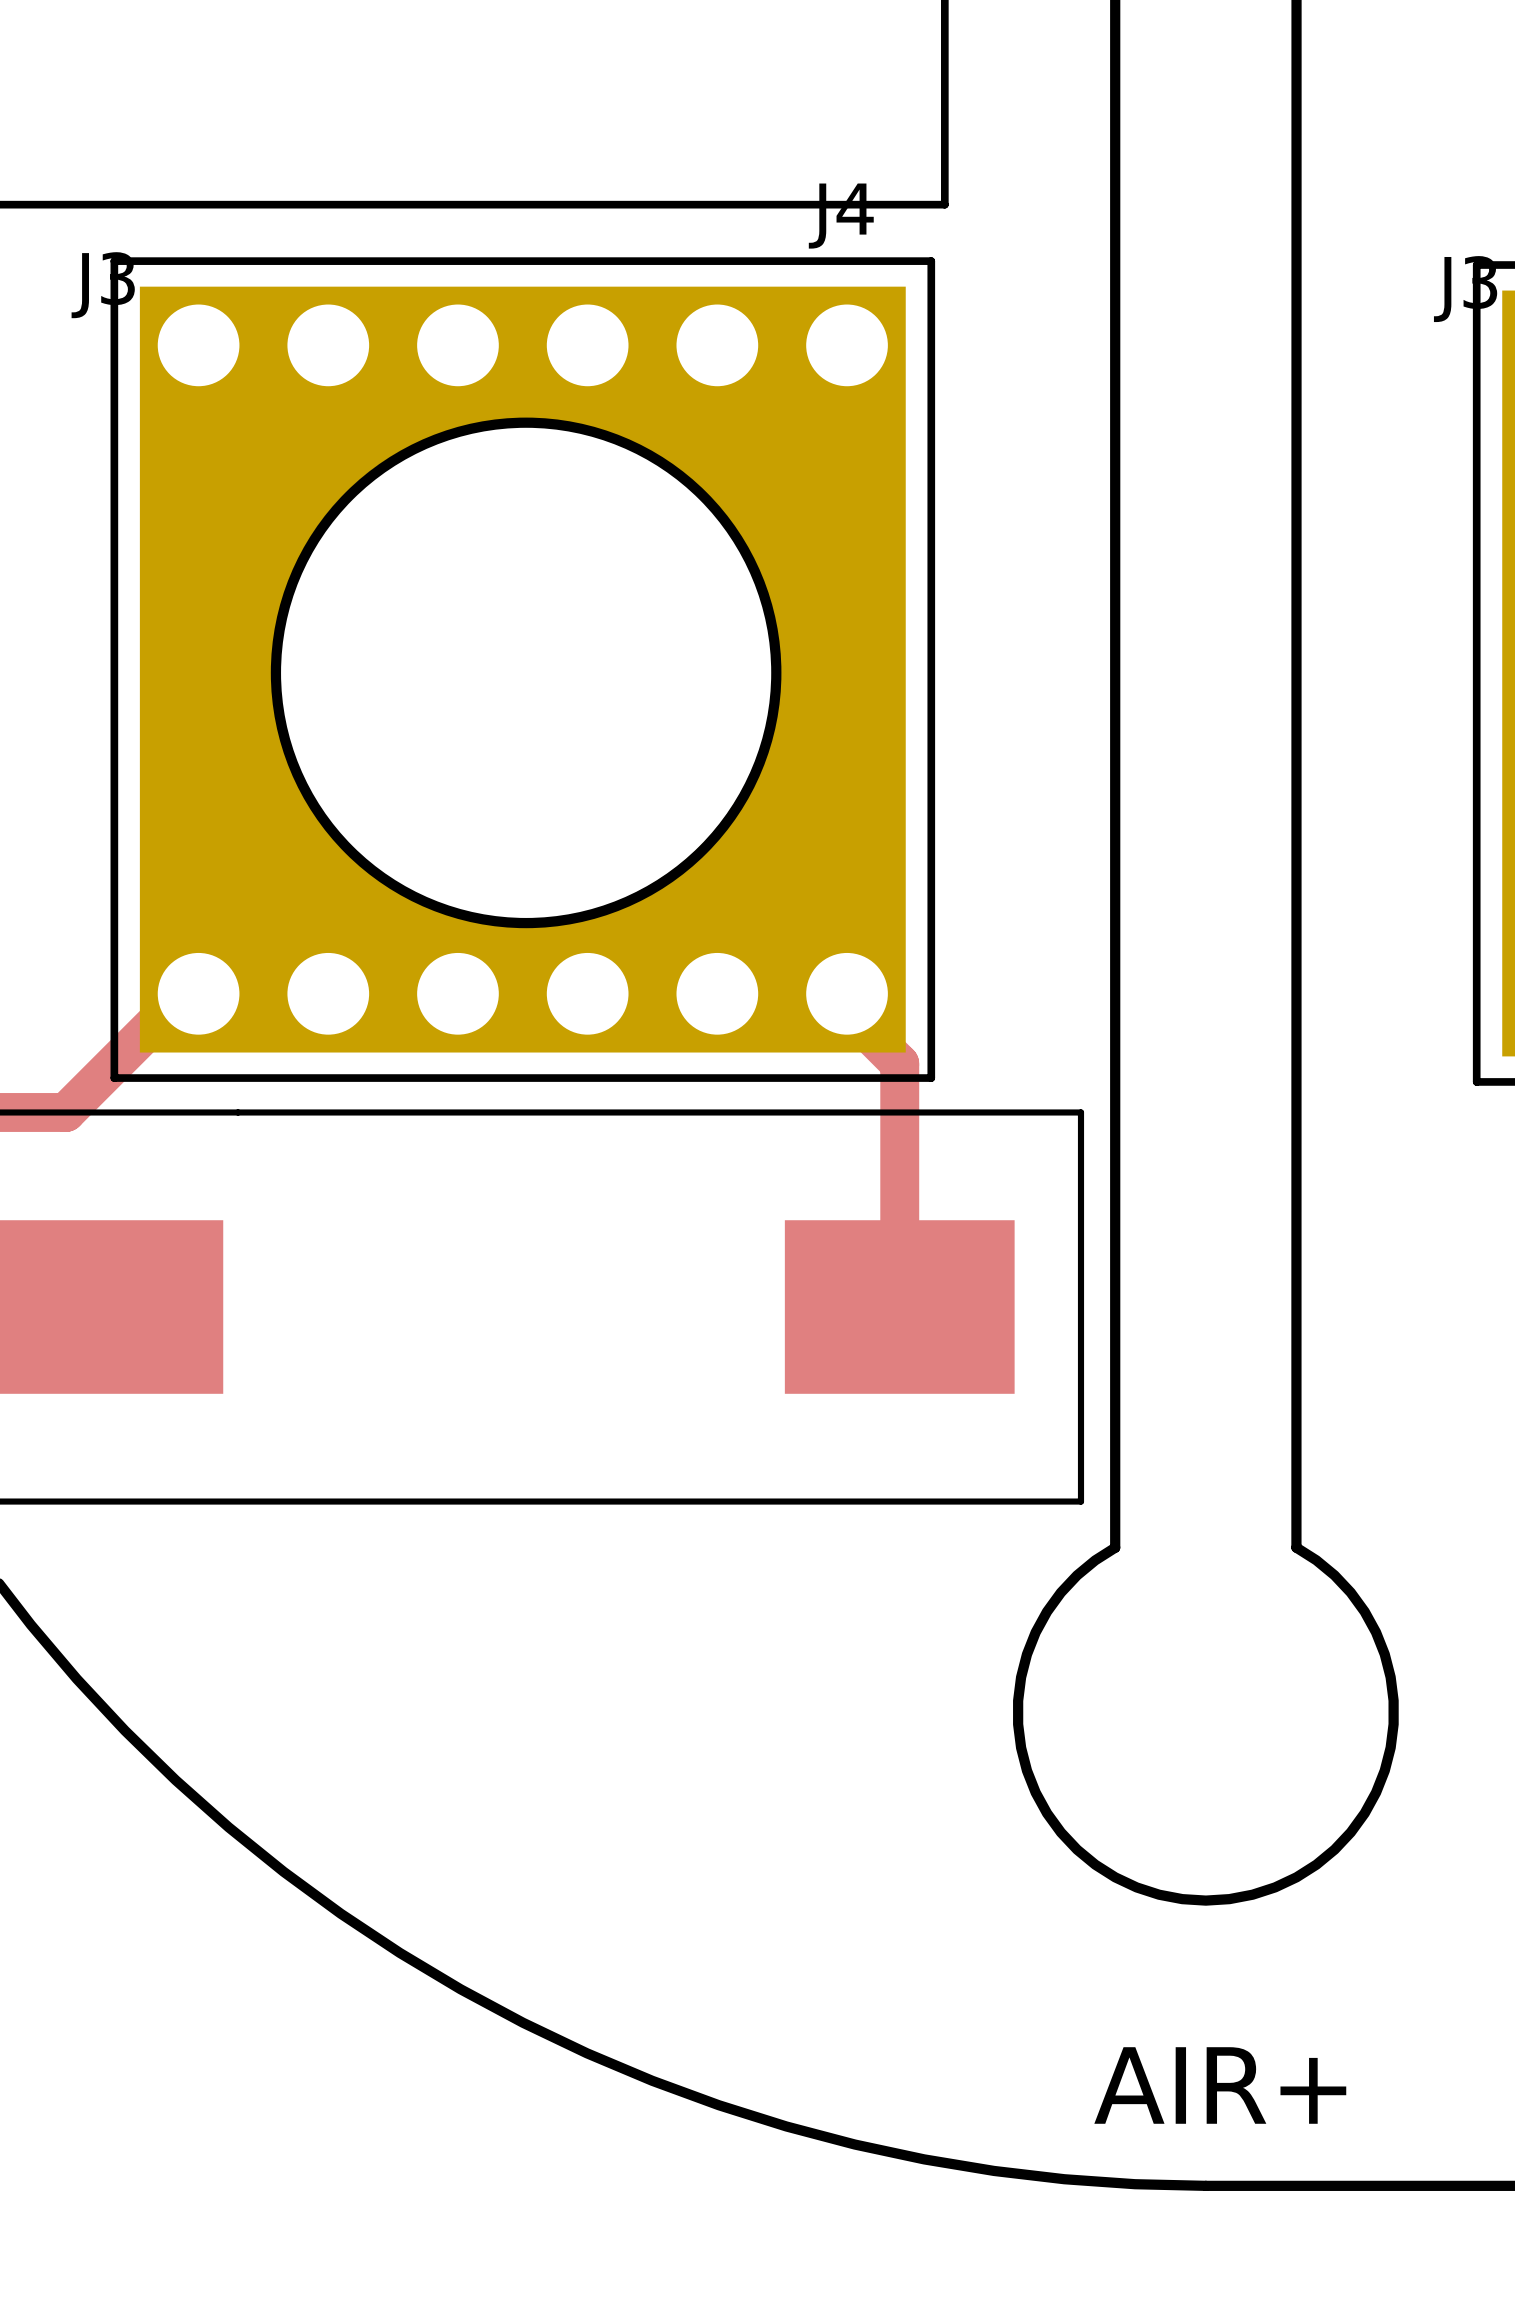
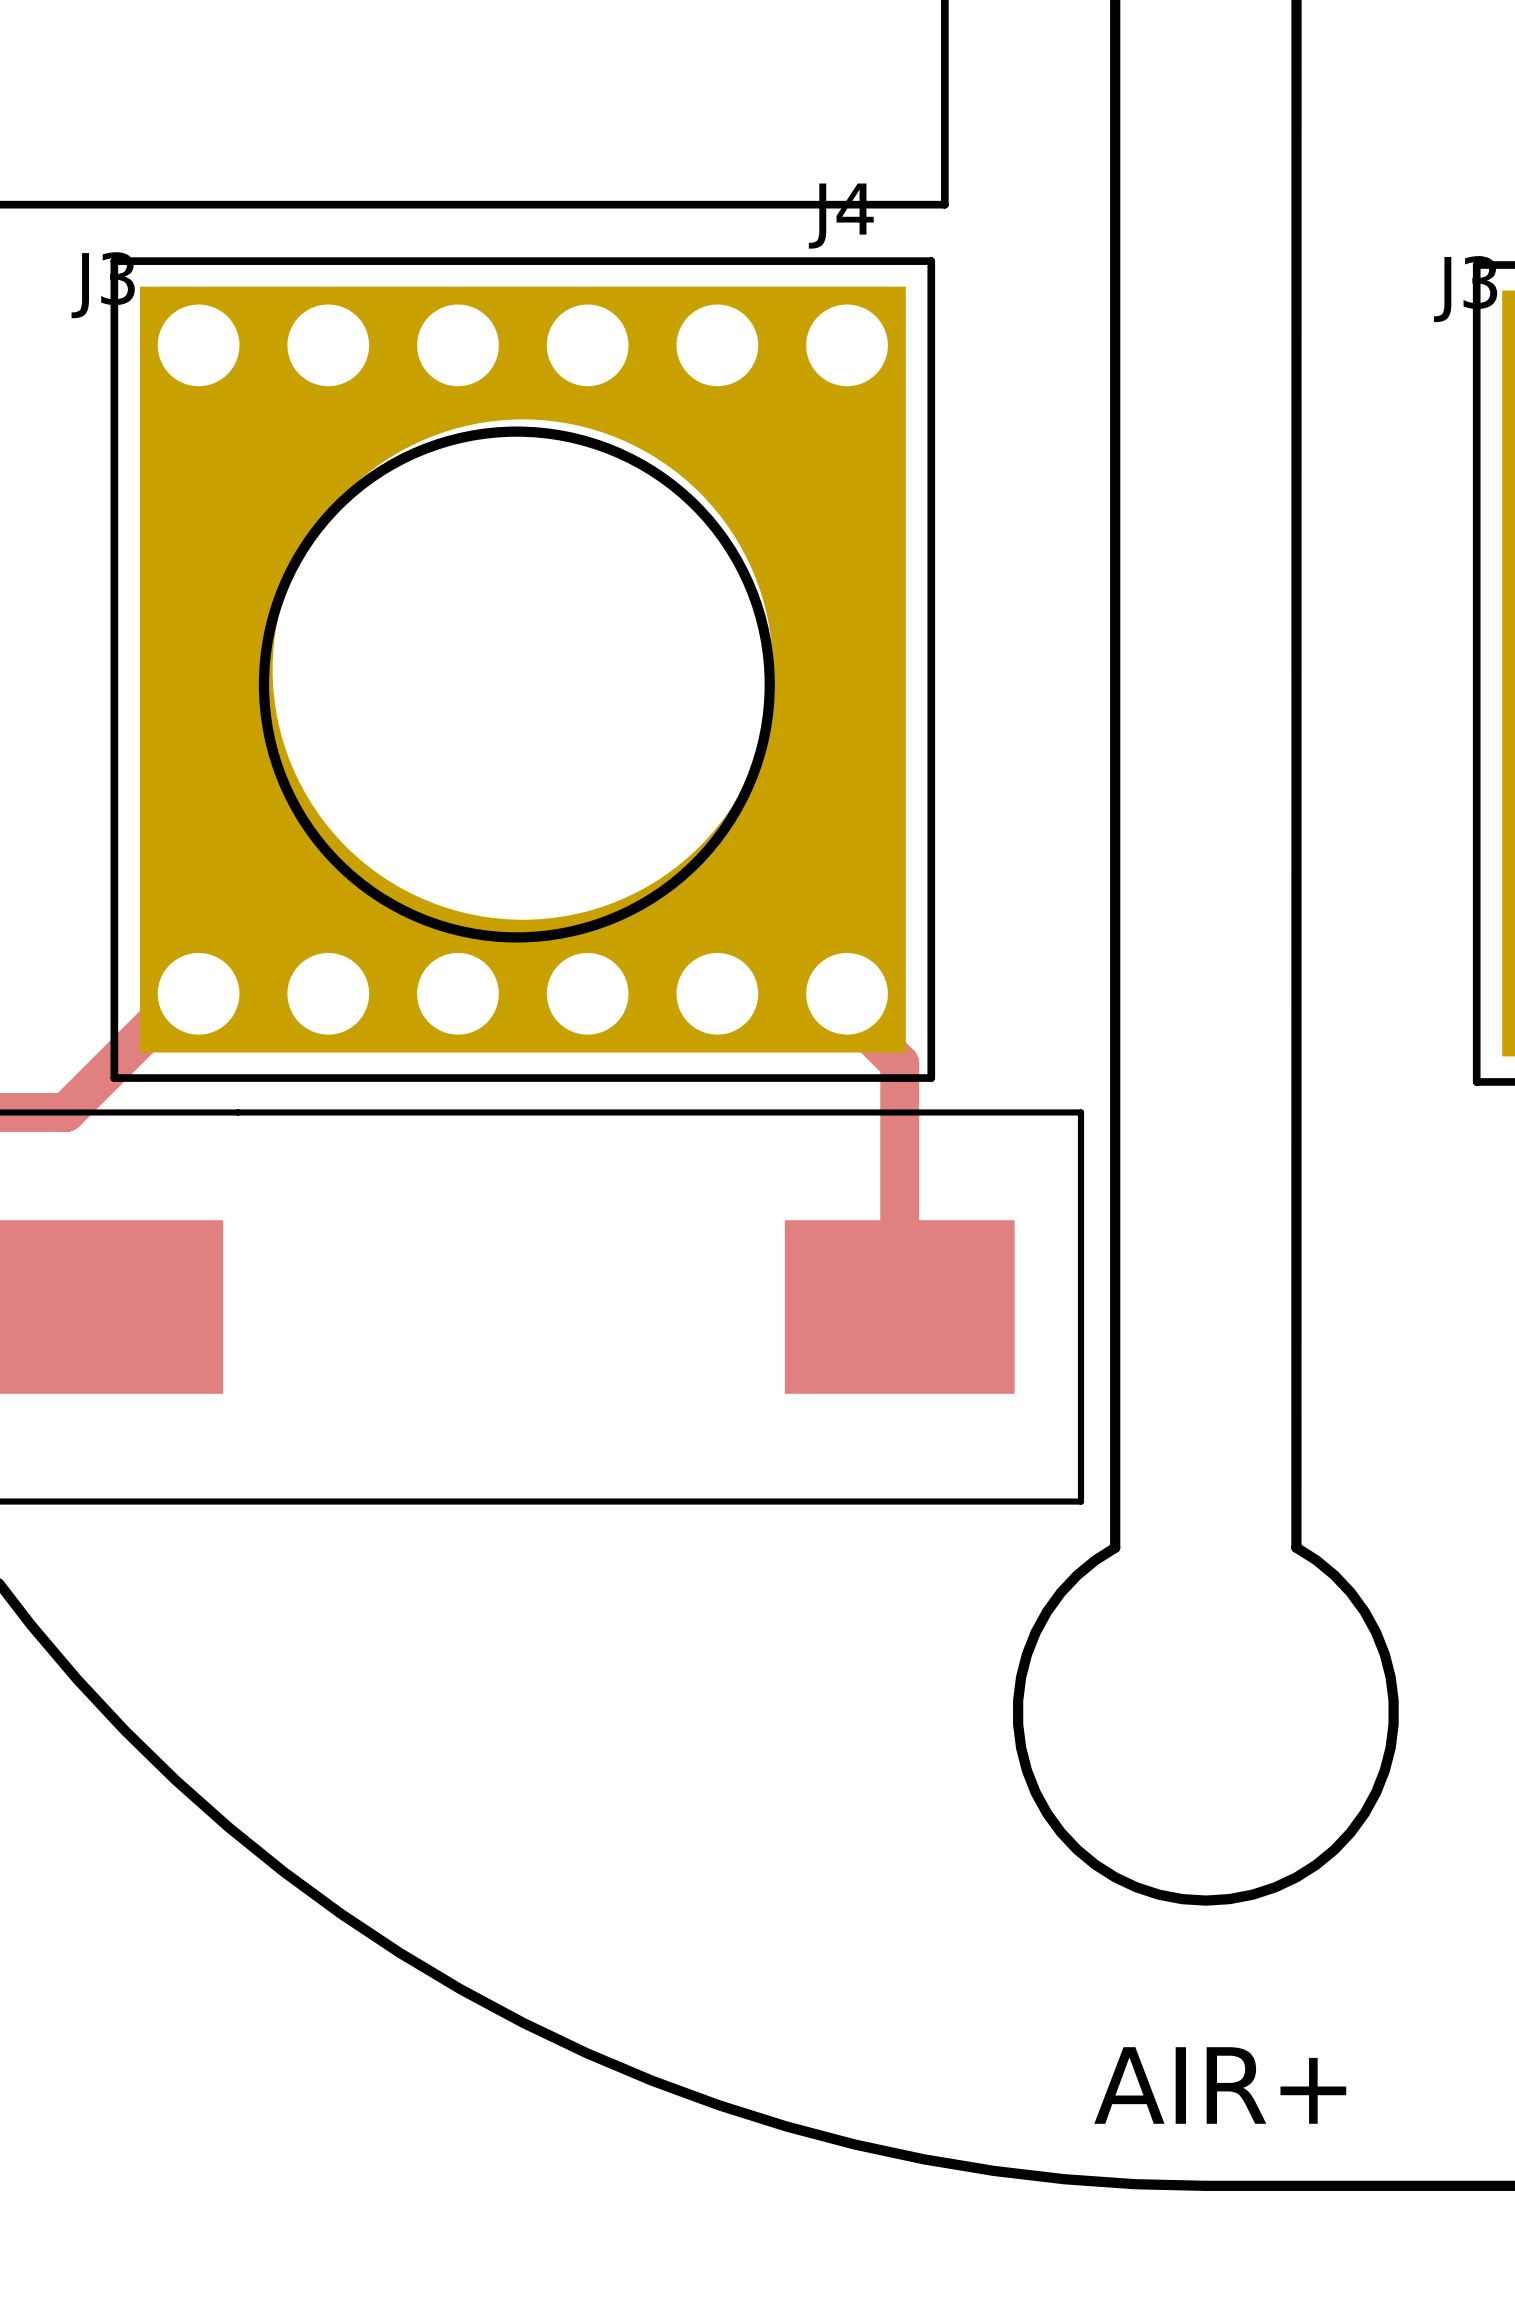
round board edge position: (526, 672) -> (516, 684)

